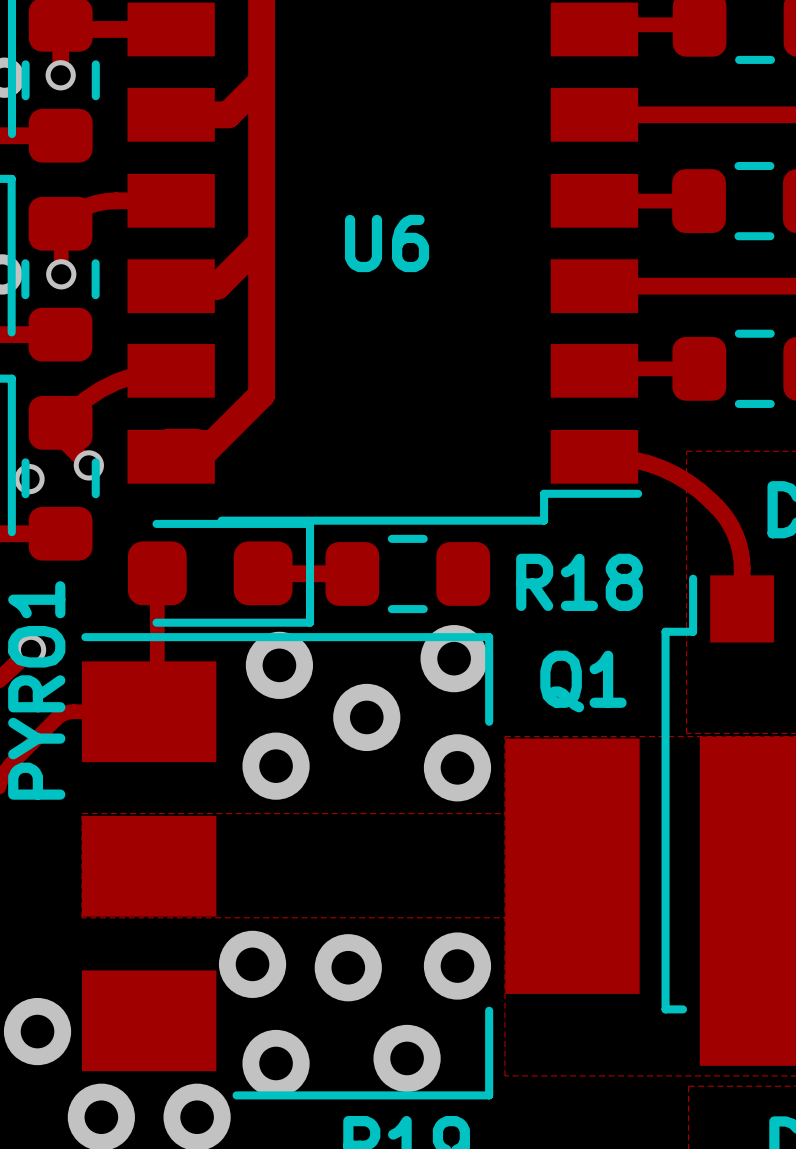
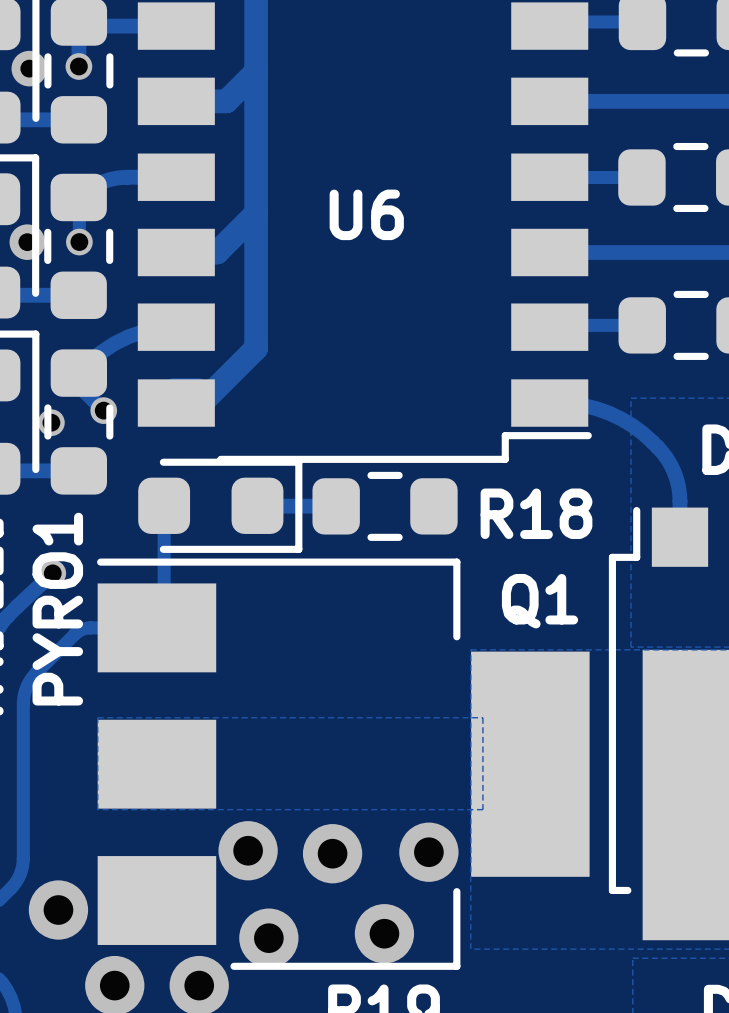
via: (454, 658) -> none
via: (279, 665) -> none
via: (366, 717) -> none
via: (276, 766) -> none
via: (457, 767) -> none

